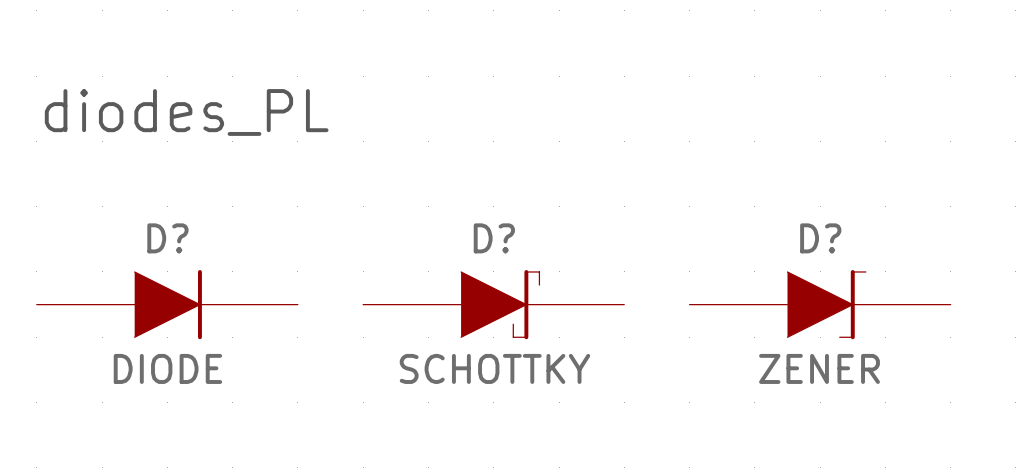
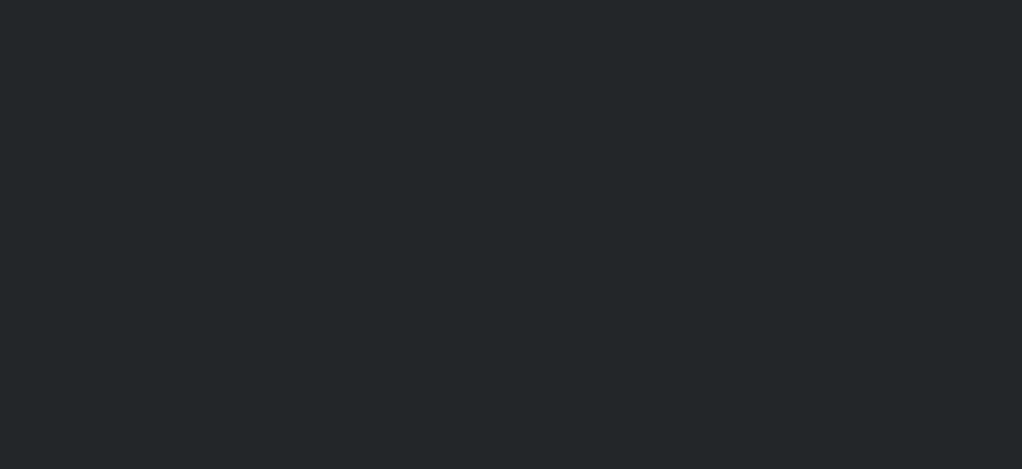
text: diodes_PL (186, 112) -> none
D?: DIODE (167, 304) -> none
D?: SCHOTTKY (493, 304) -> none
D?: ZENER (820, 304) -> none

